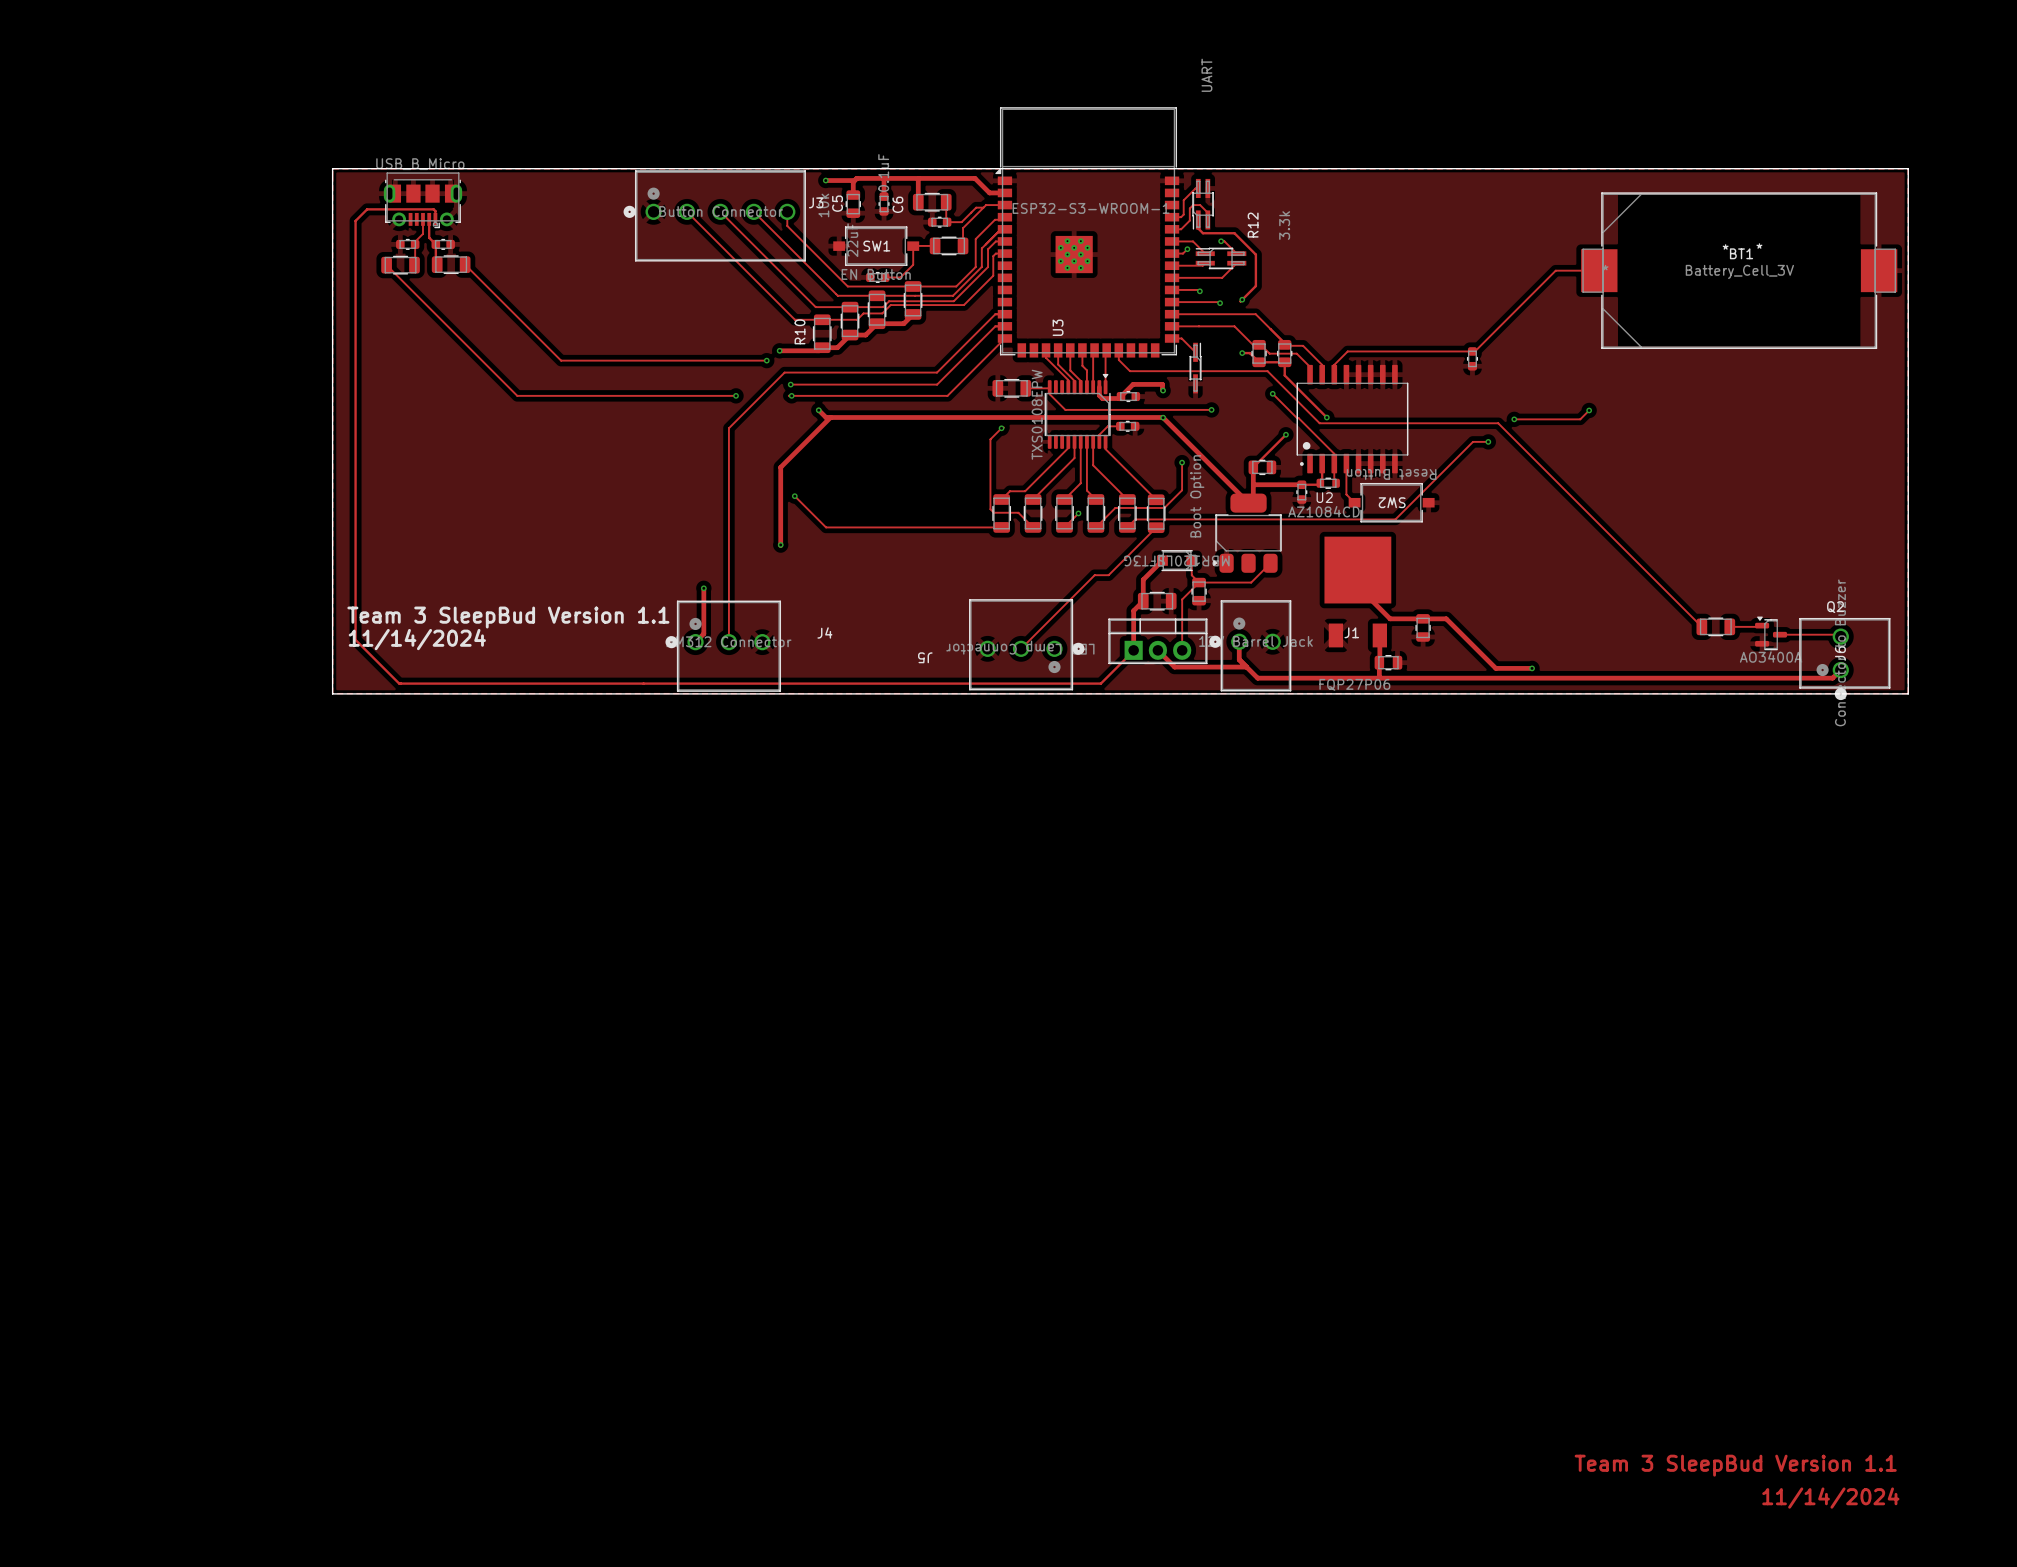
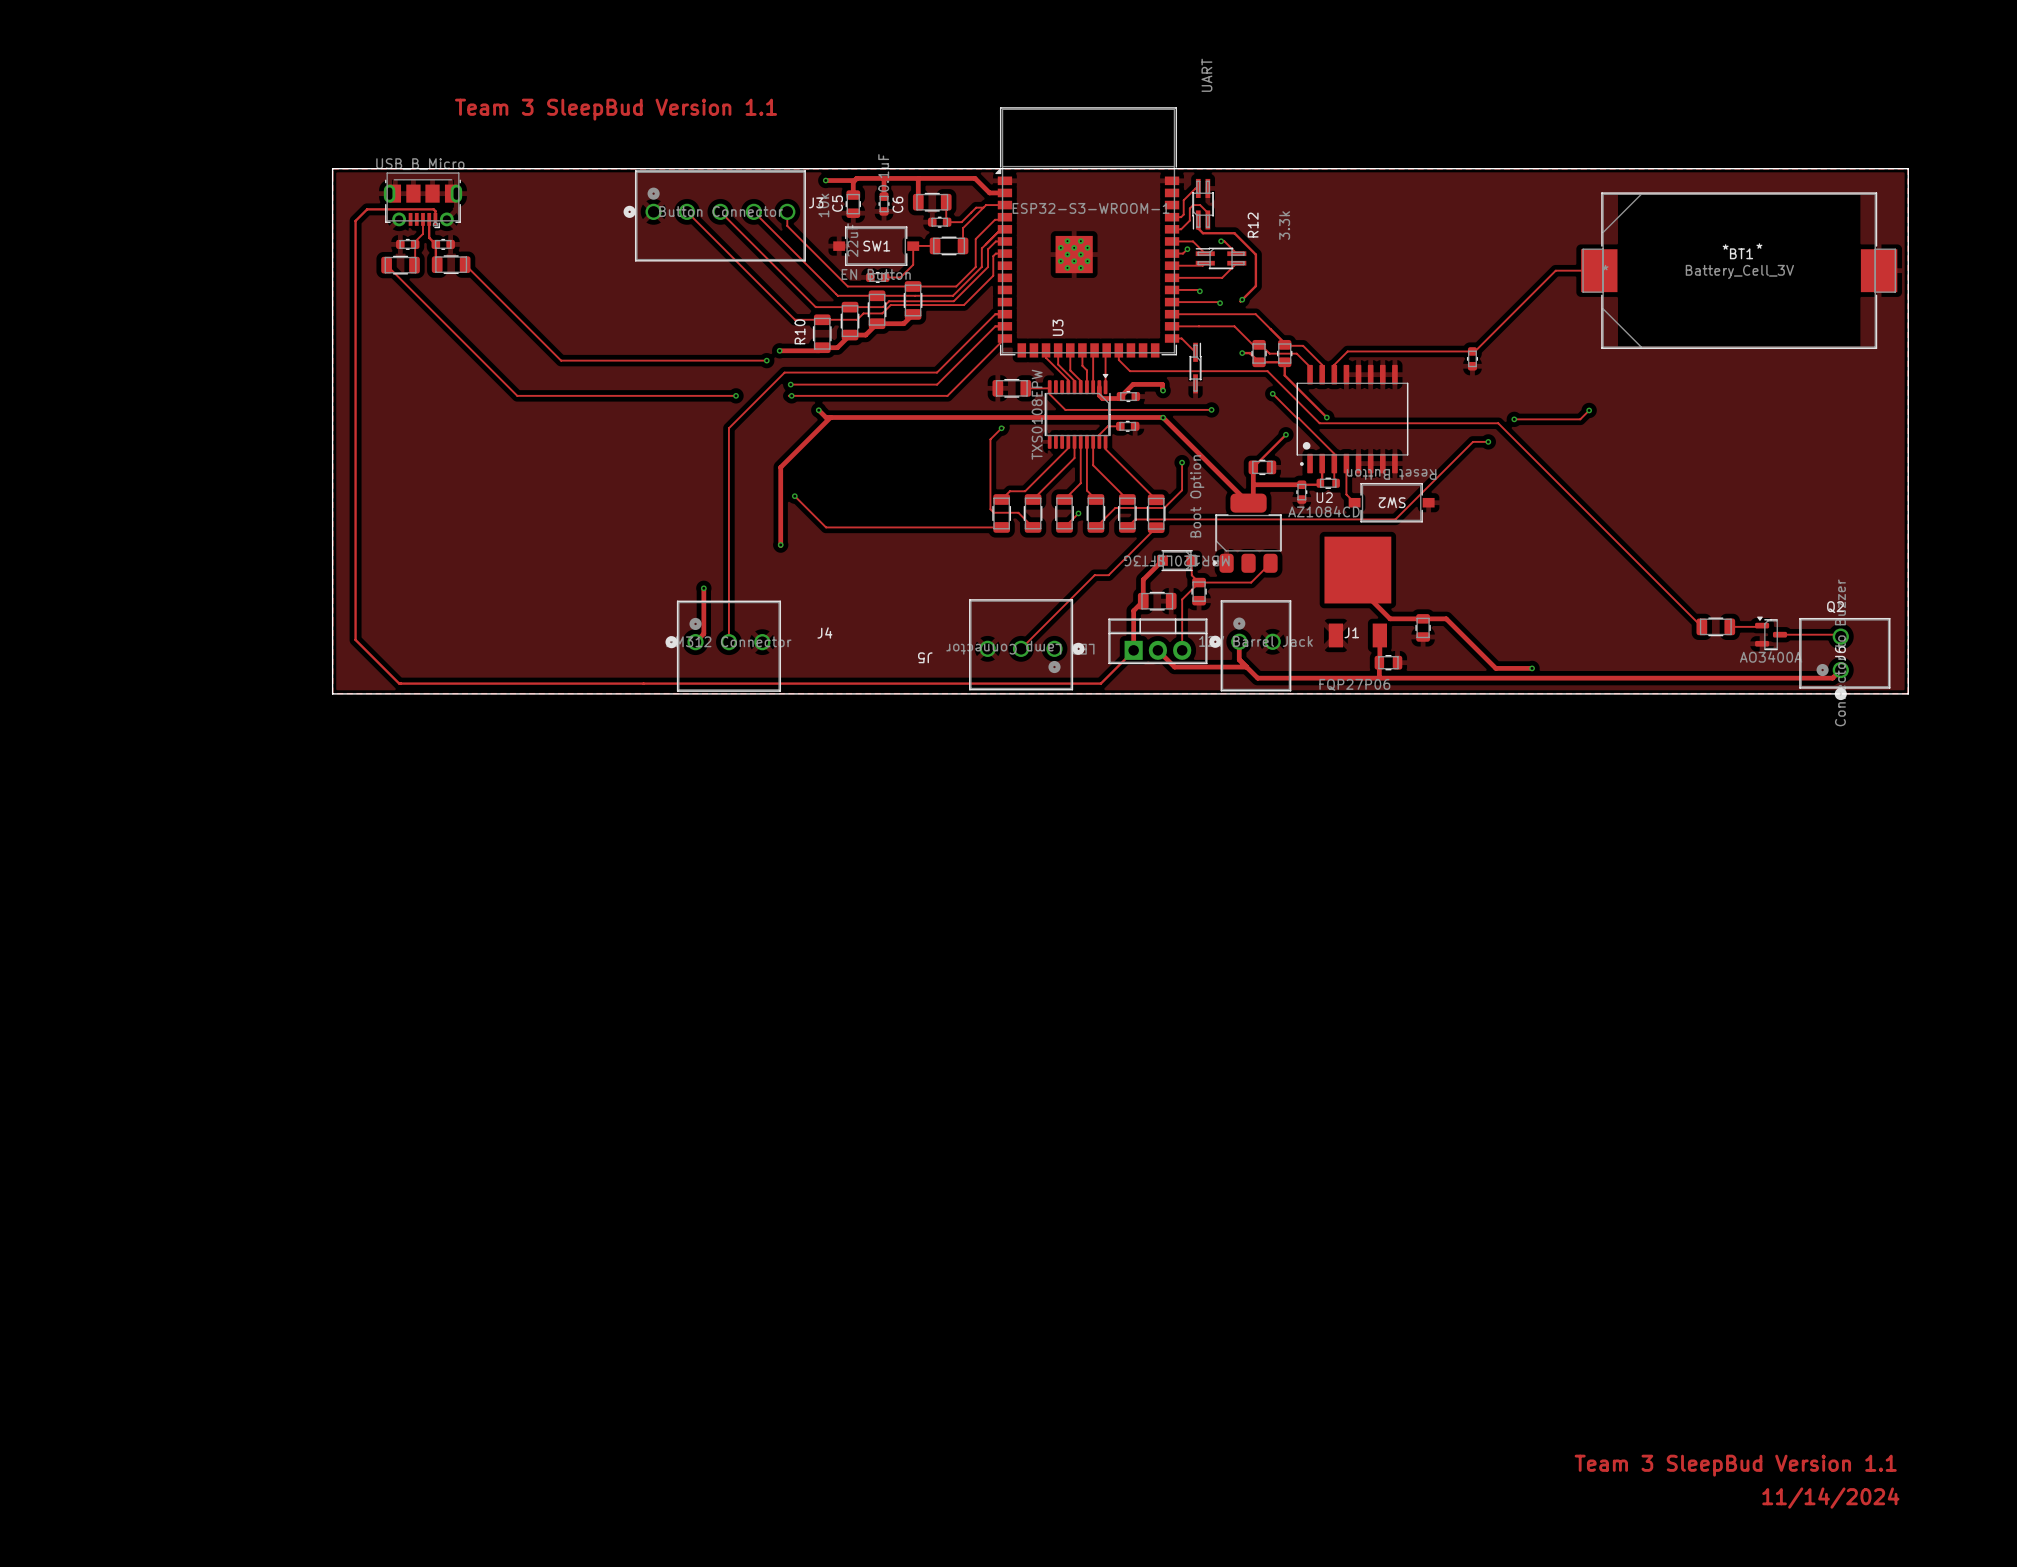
text: none -> Team 3 SleepBud Version 1.1 (616, 109)
text: Team 3 SleepBud Version 1.1 (508, 617) -> none
text: 11/14/2024 (417, 639) -> none

